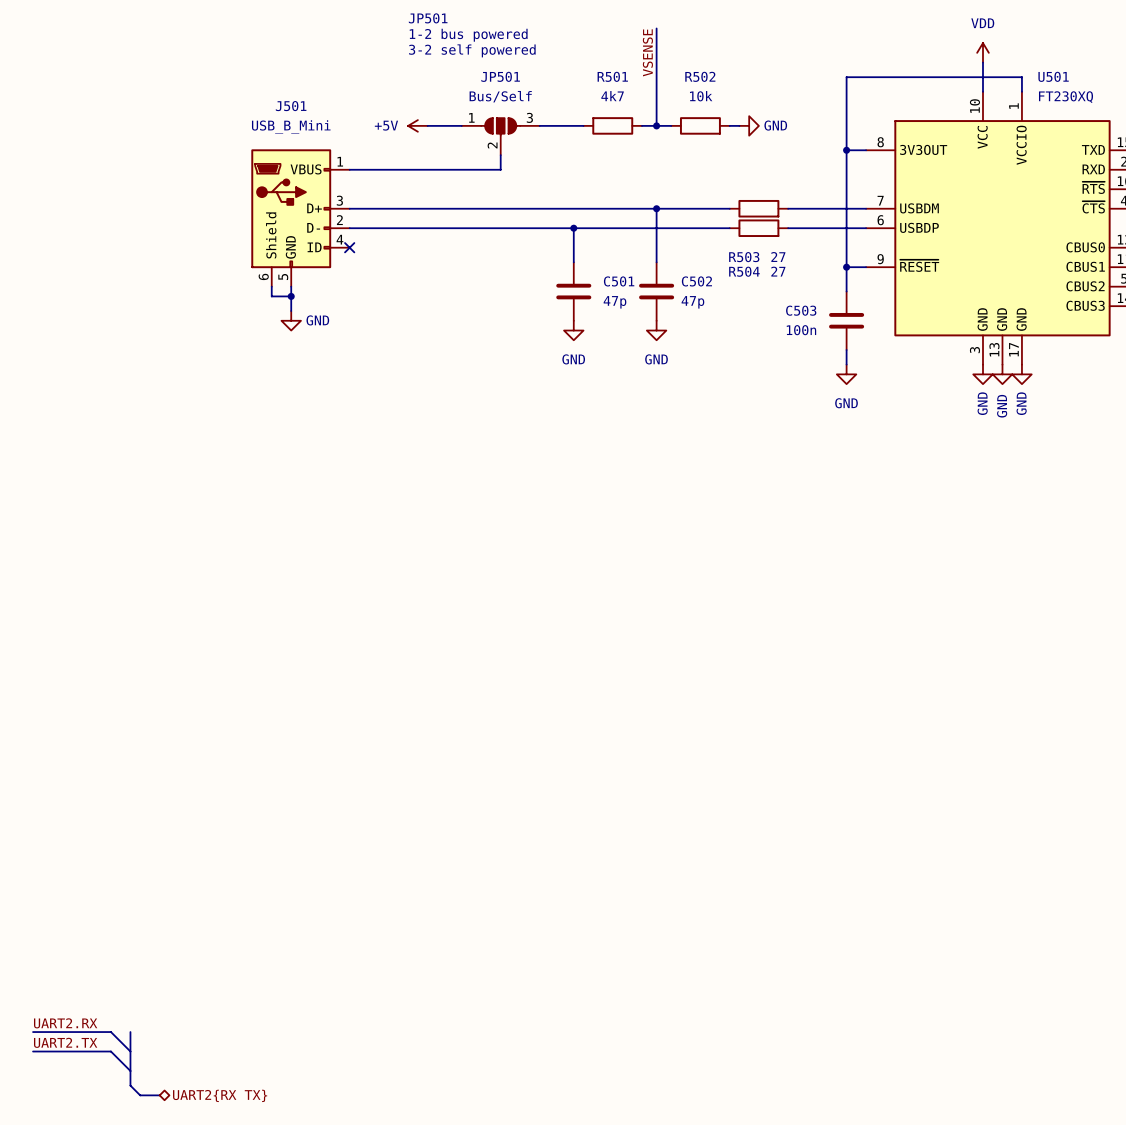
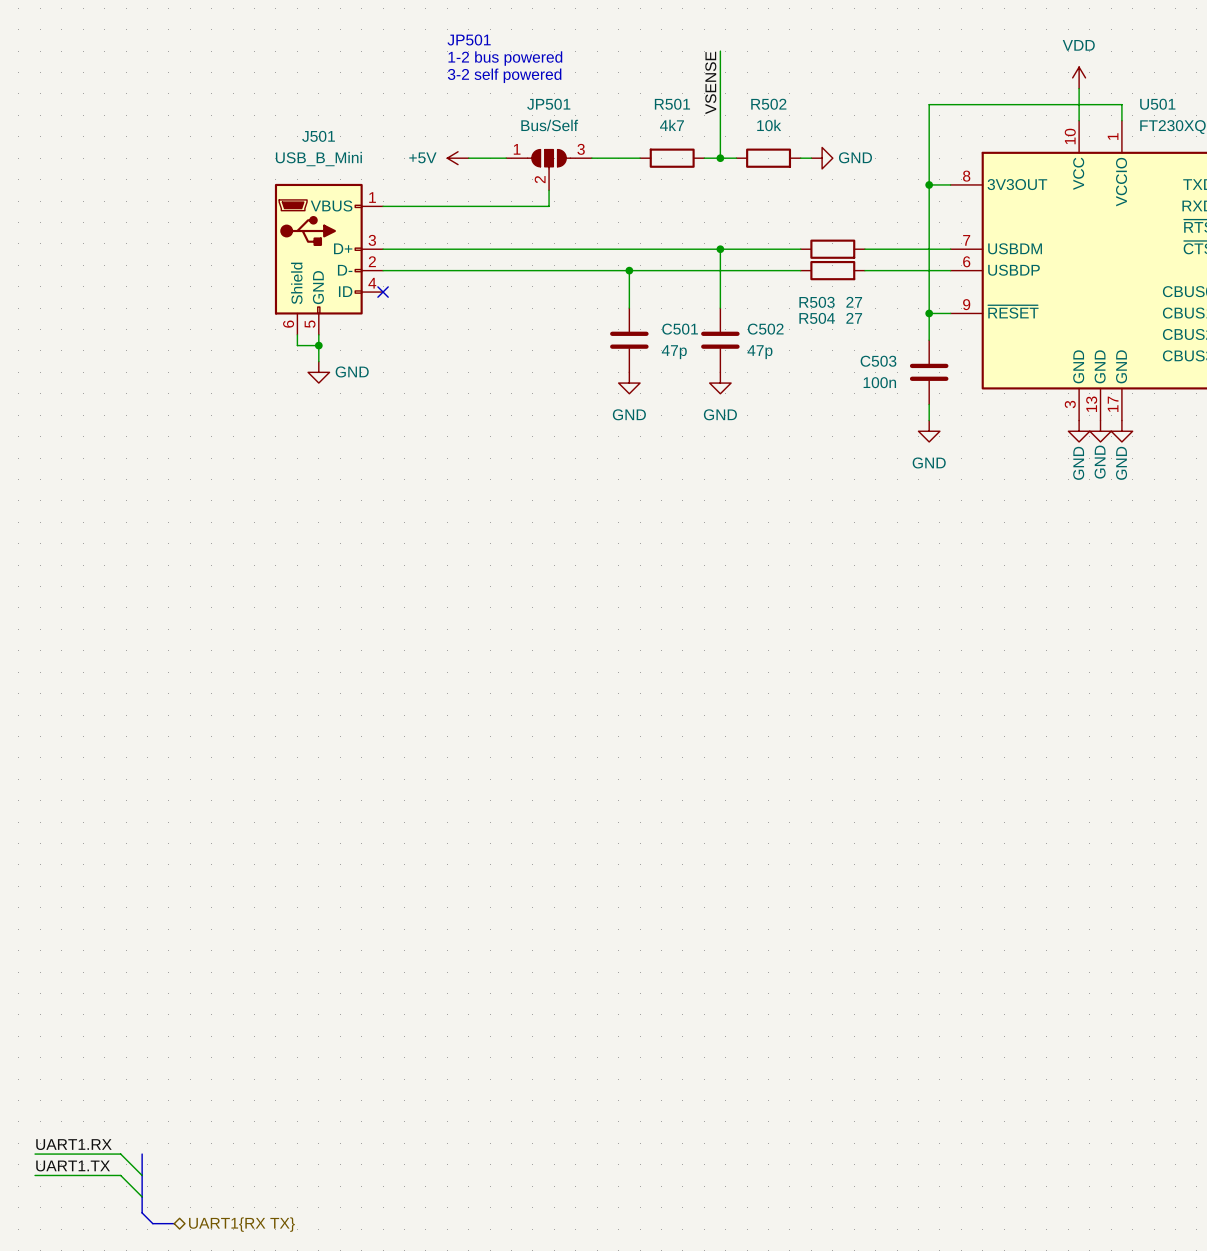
label: UART2.RX (65, 1023) -> UART1.RX (73, 1144)
label: UART2.TX (65, 1042) -> UART1.TX (73, 1165)
hierarchical label: UART2{RX TX} (220, 1095) -> UART1{RX TX} (241, 1224)

